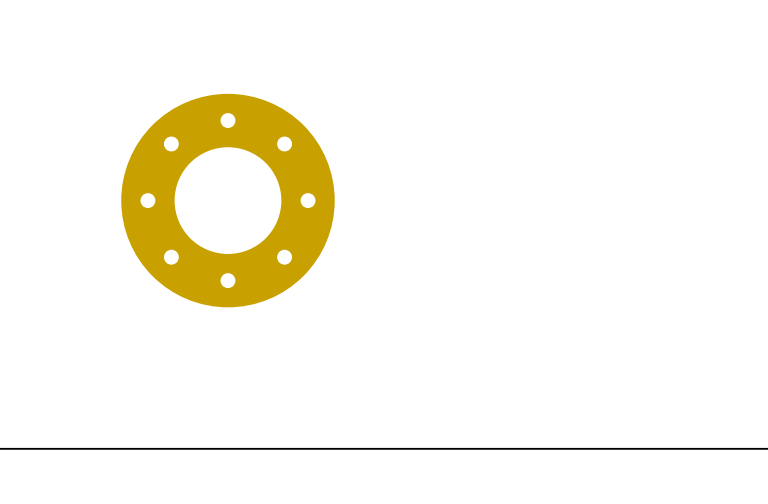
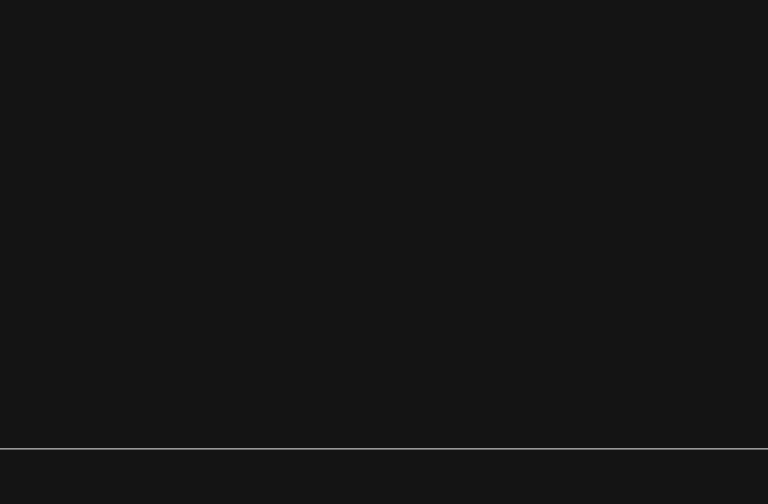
part: (227, 200) -> none

